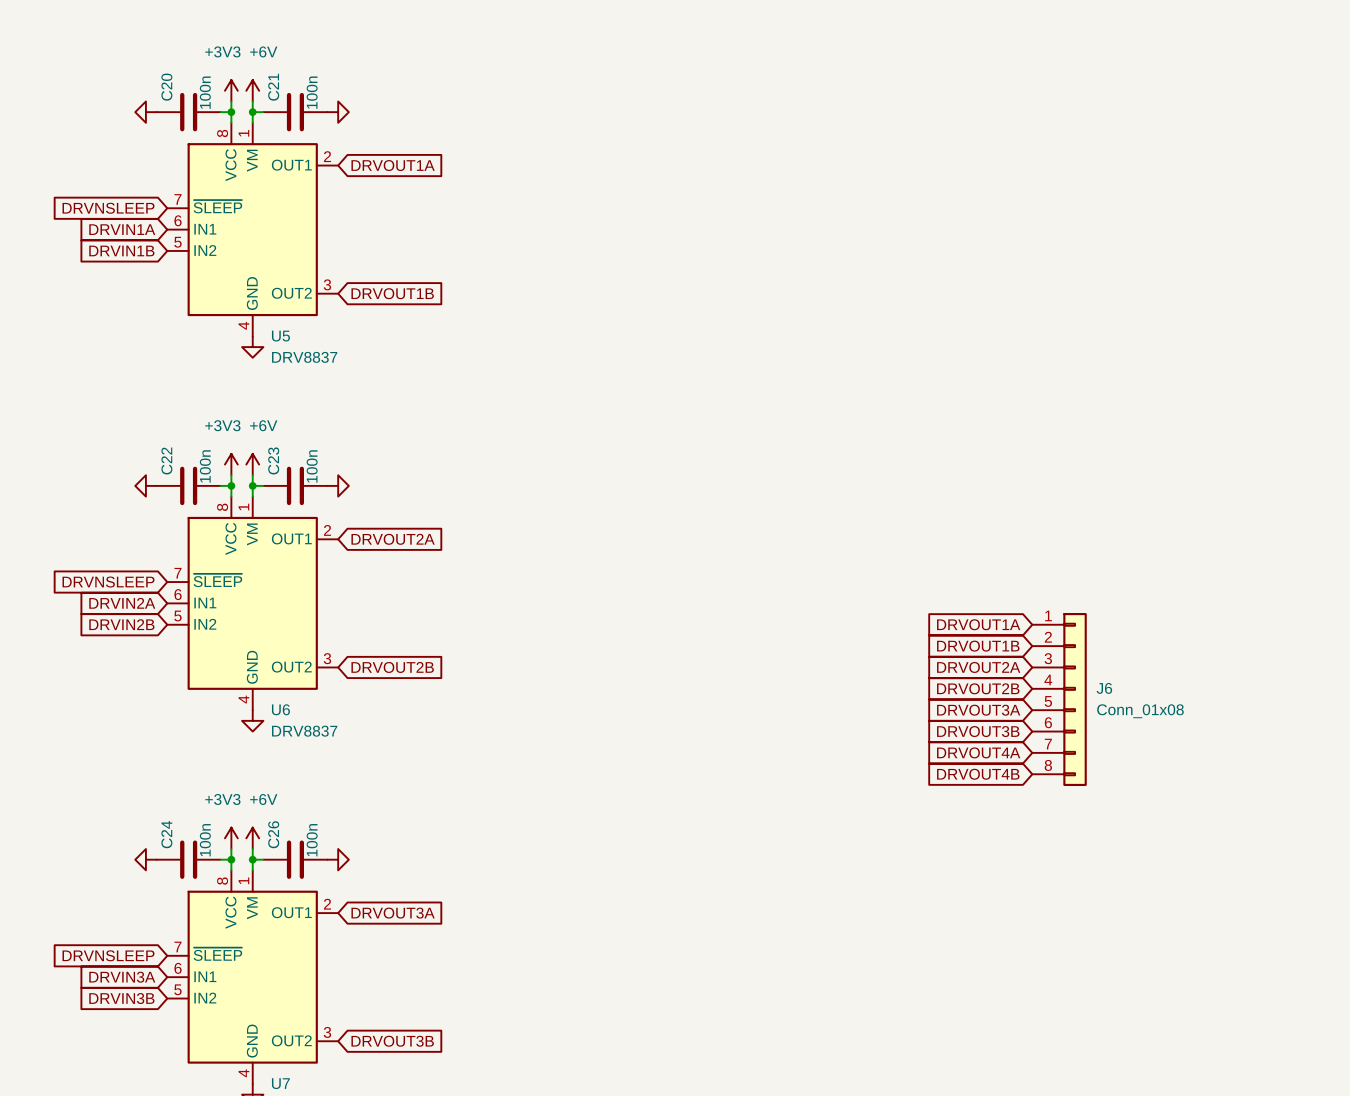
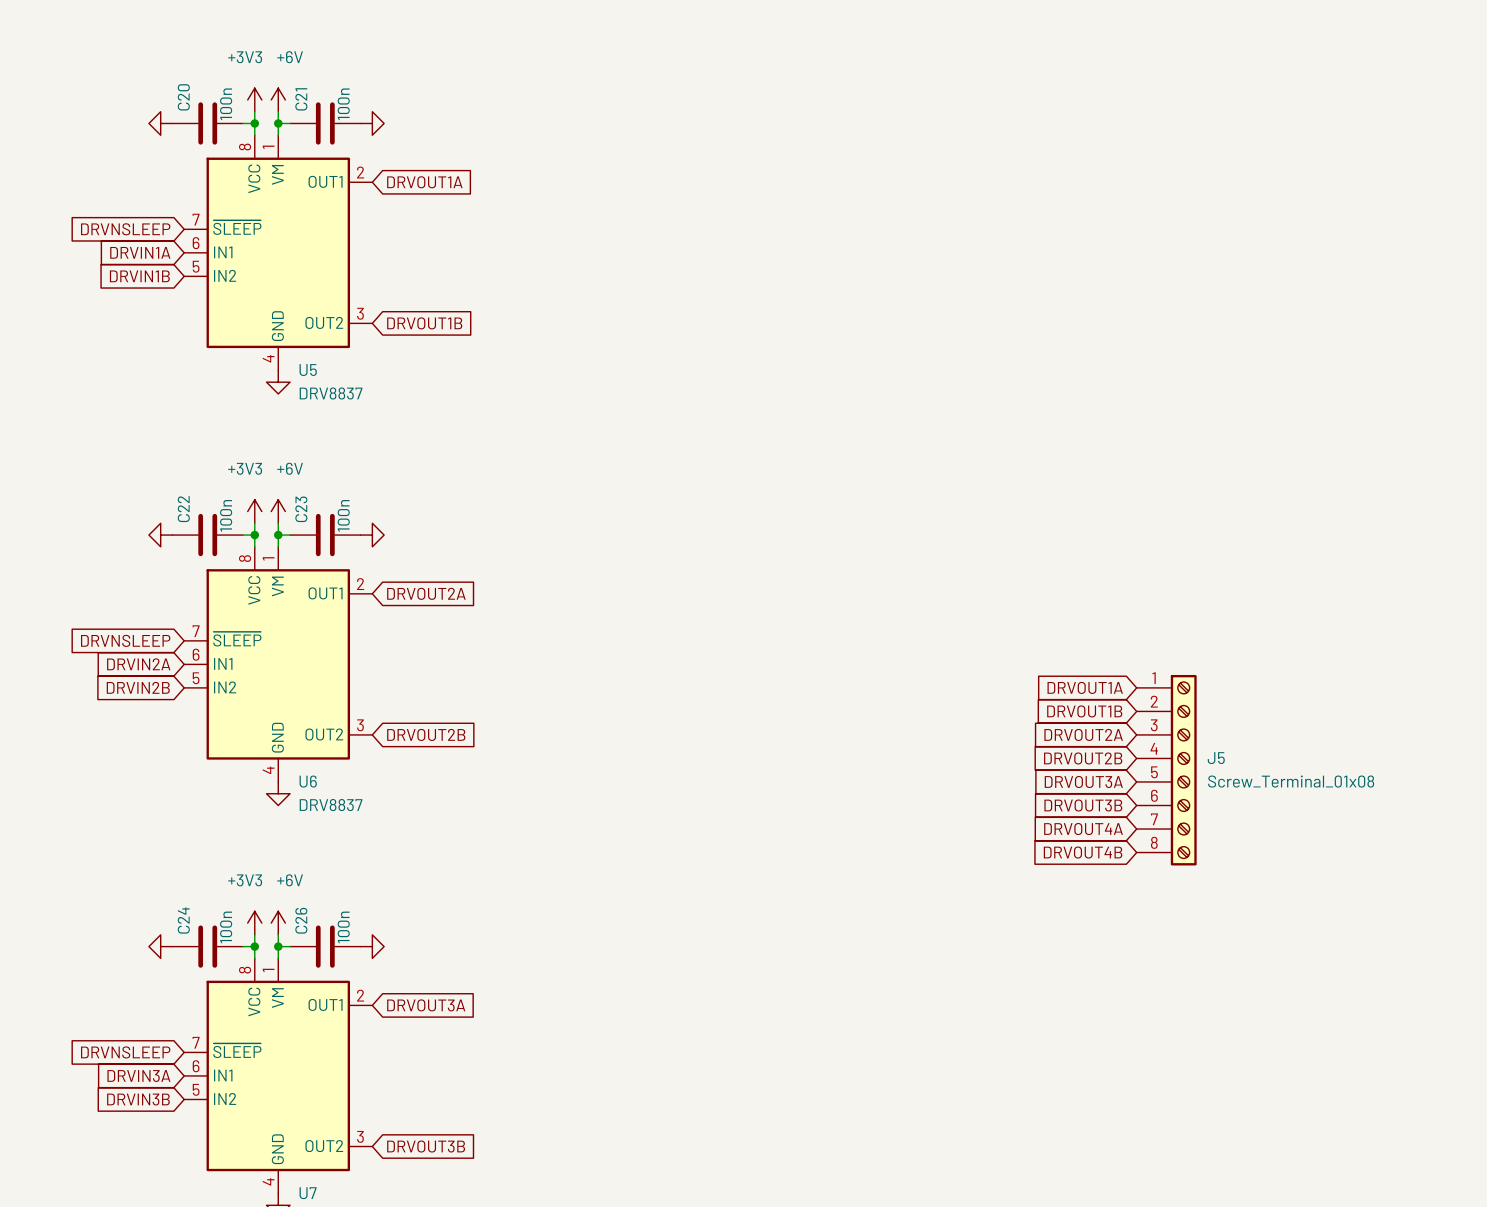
J6: Conn_01x08 (1059, 699) -> none
J5: none -> Screw_Terminal_01x08 (1166, 770)

